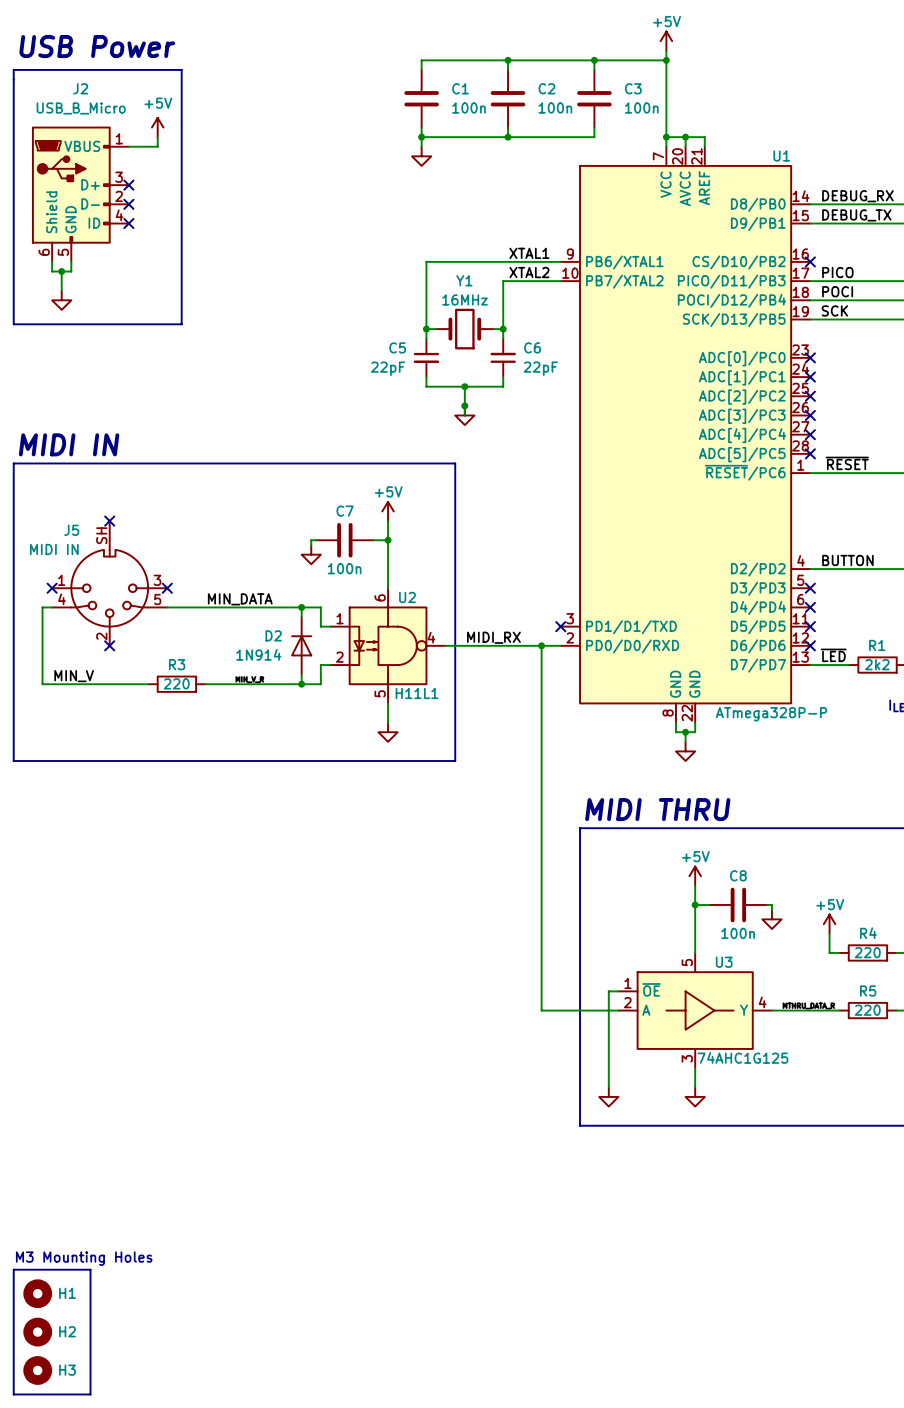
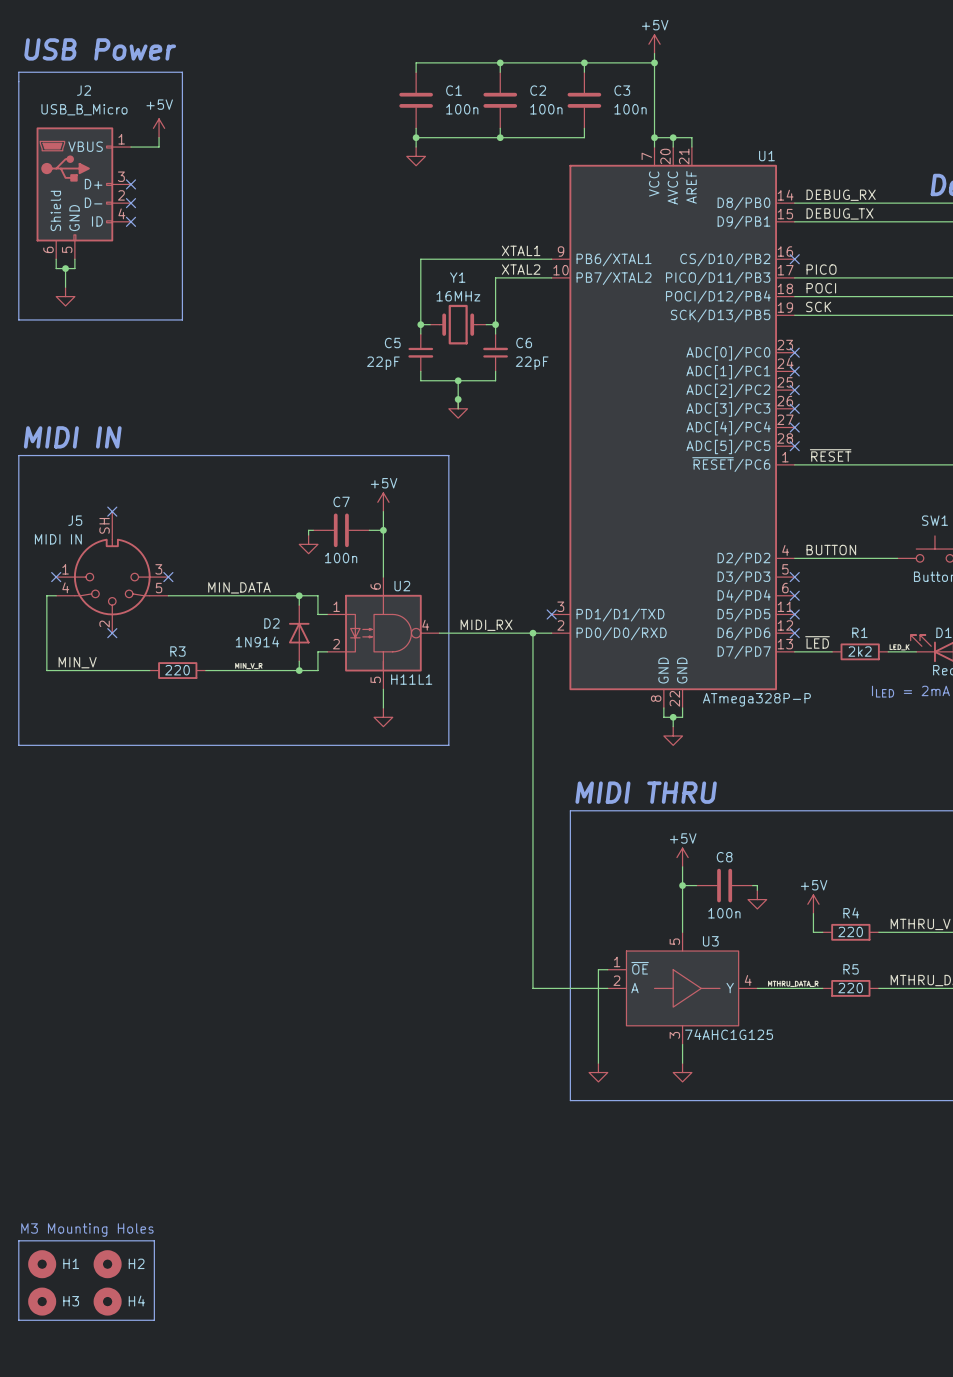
line: (90, 1269) (90, 1394) (13, 1394) (13, 1351) -> (93, 1240) (154, 1240) (154, 1320) (18, 1320)
H2: none -> (107, 1264)
H2 name: H2 (67, 1331) -> H3 (71, 1301)
H4: none -> (107, 1301)
H3: (37, 1370) -> none

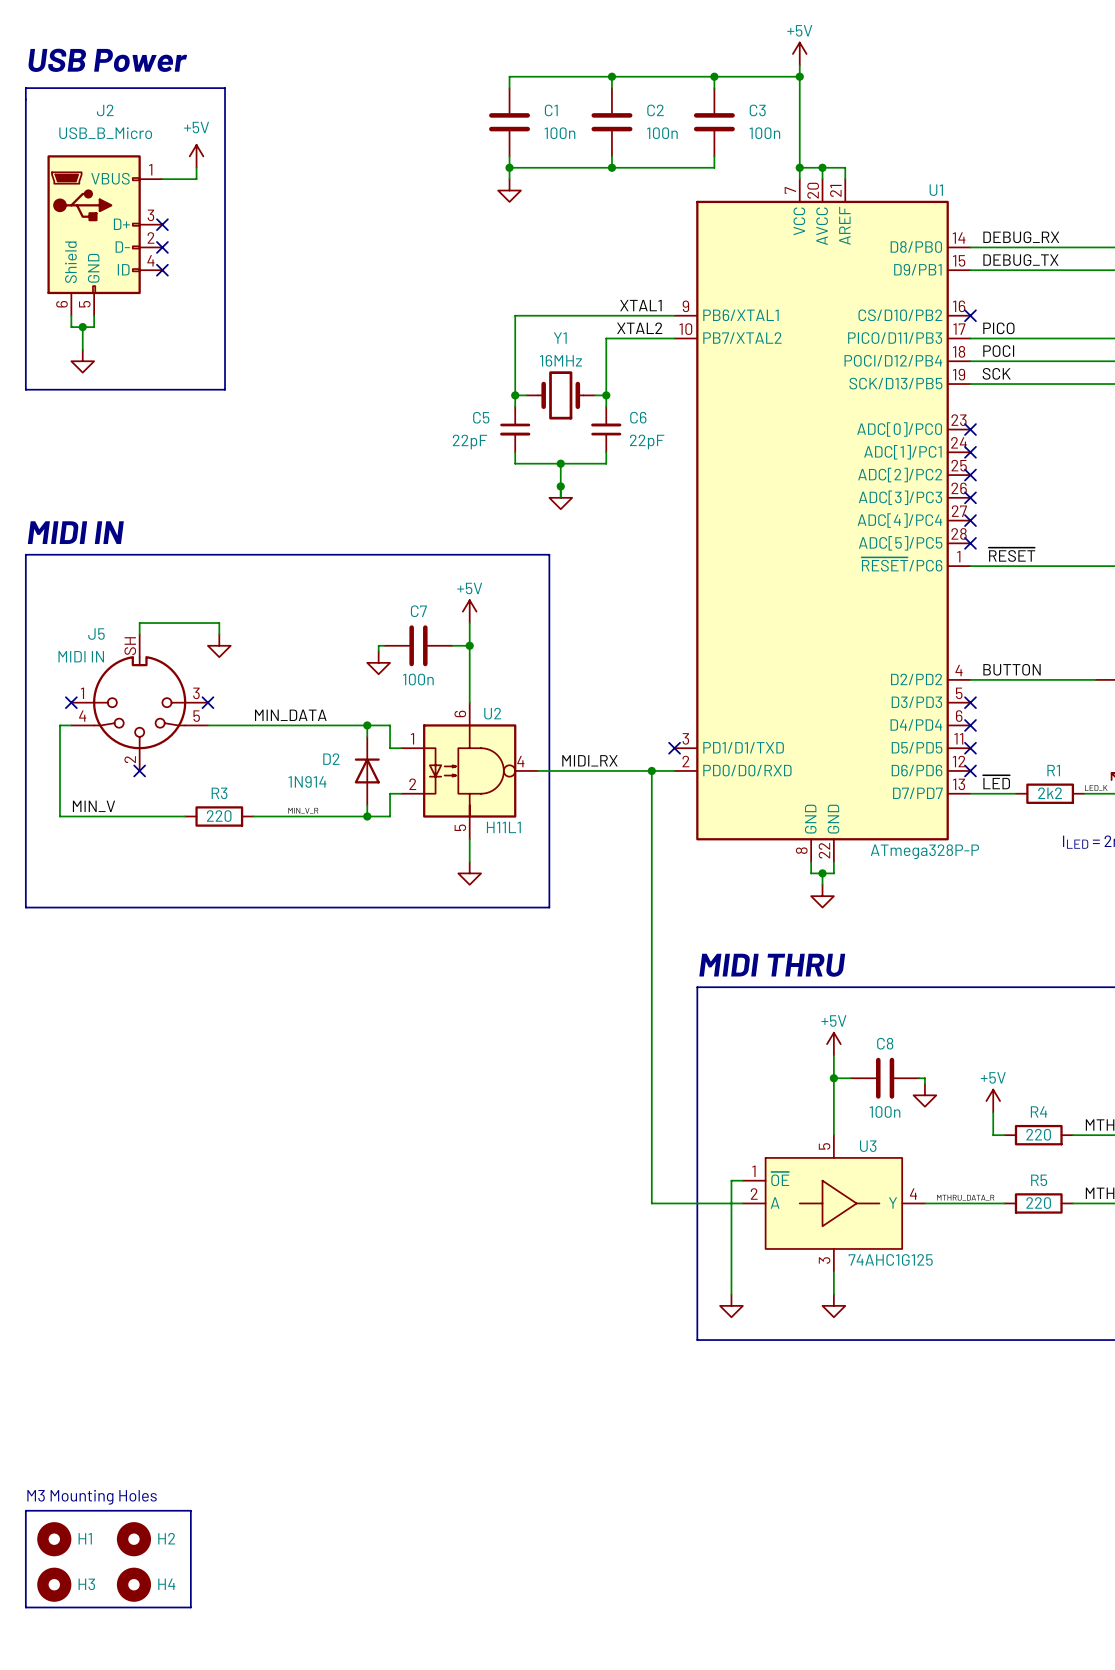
J5 symbol: [56, 511, 169, 634] -> [71, 634, 208, 771]
no-connect mark: (112, 511) -> none
wire: none -> (139, 634) (139, 623) (219, 623) (219, 634)
power symbol: none -> (219, 645)

